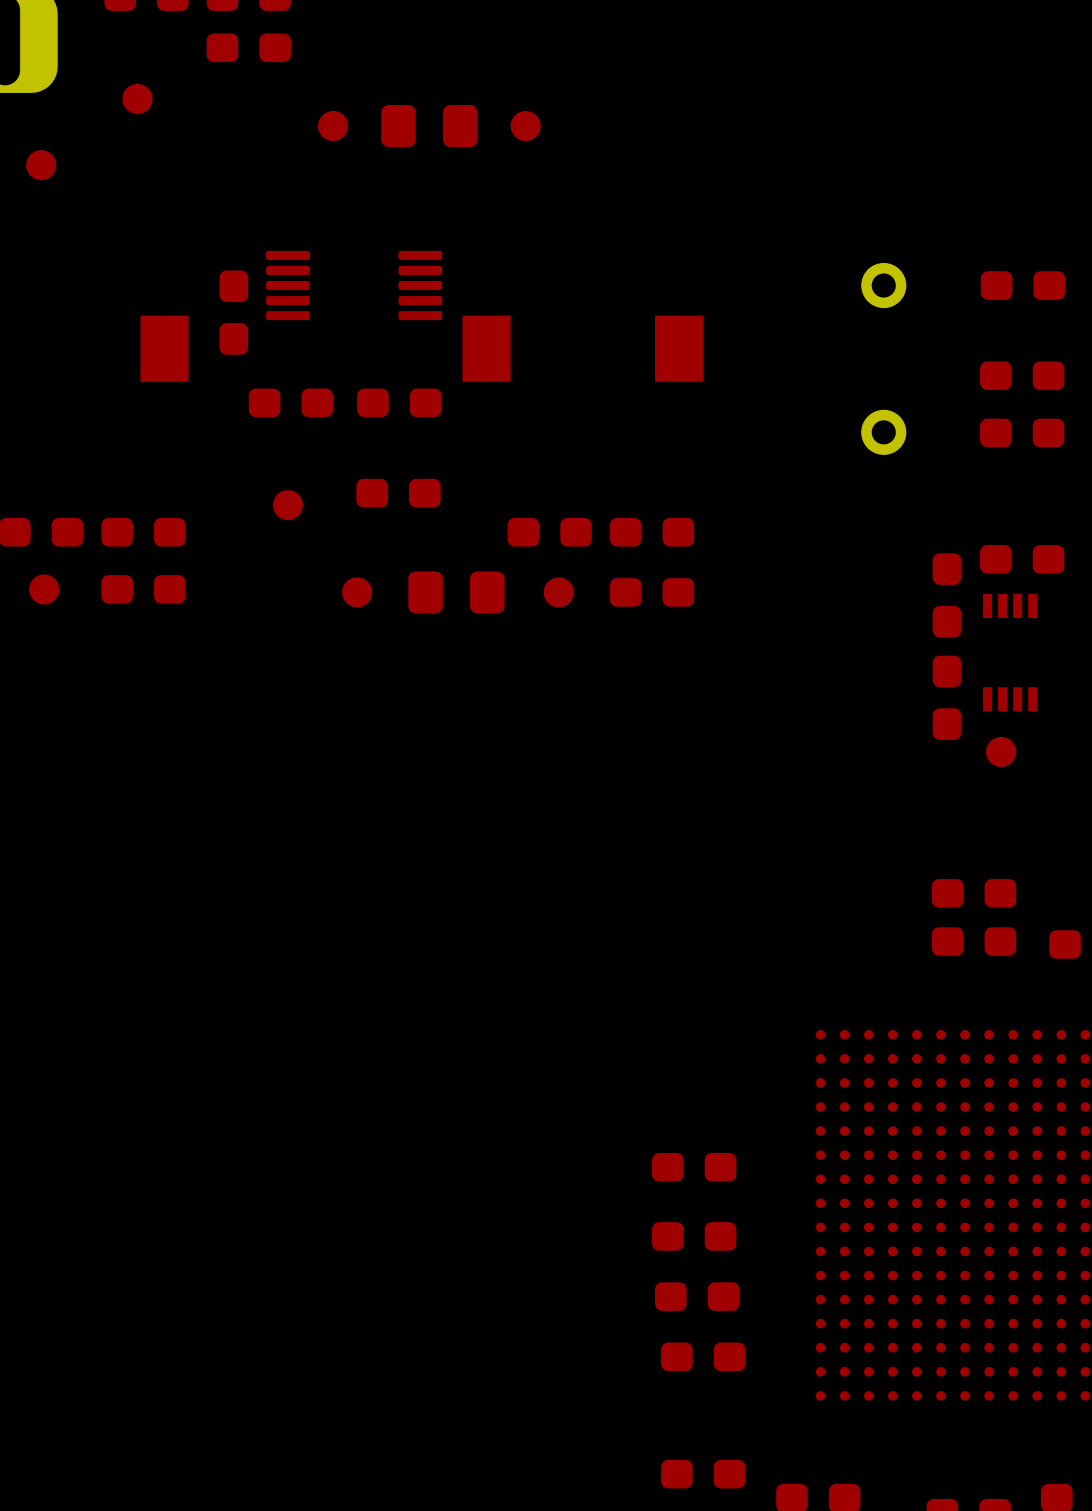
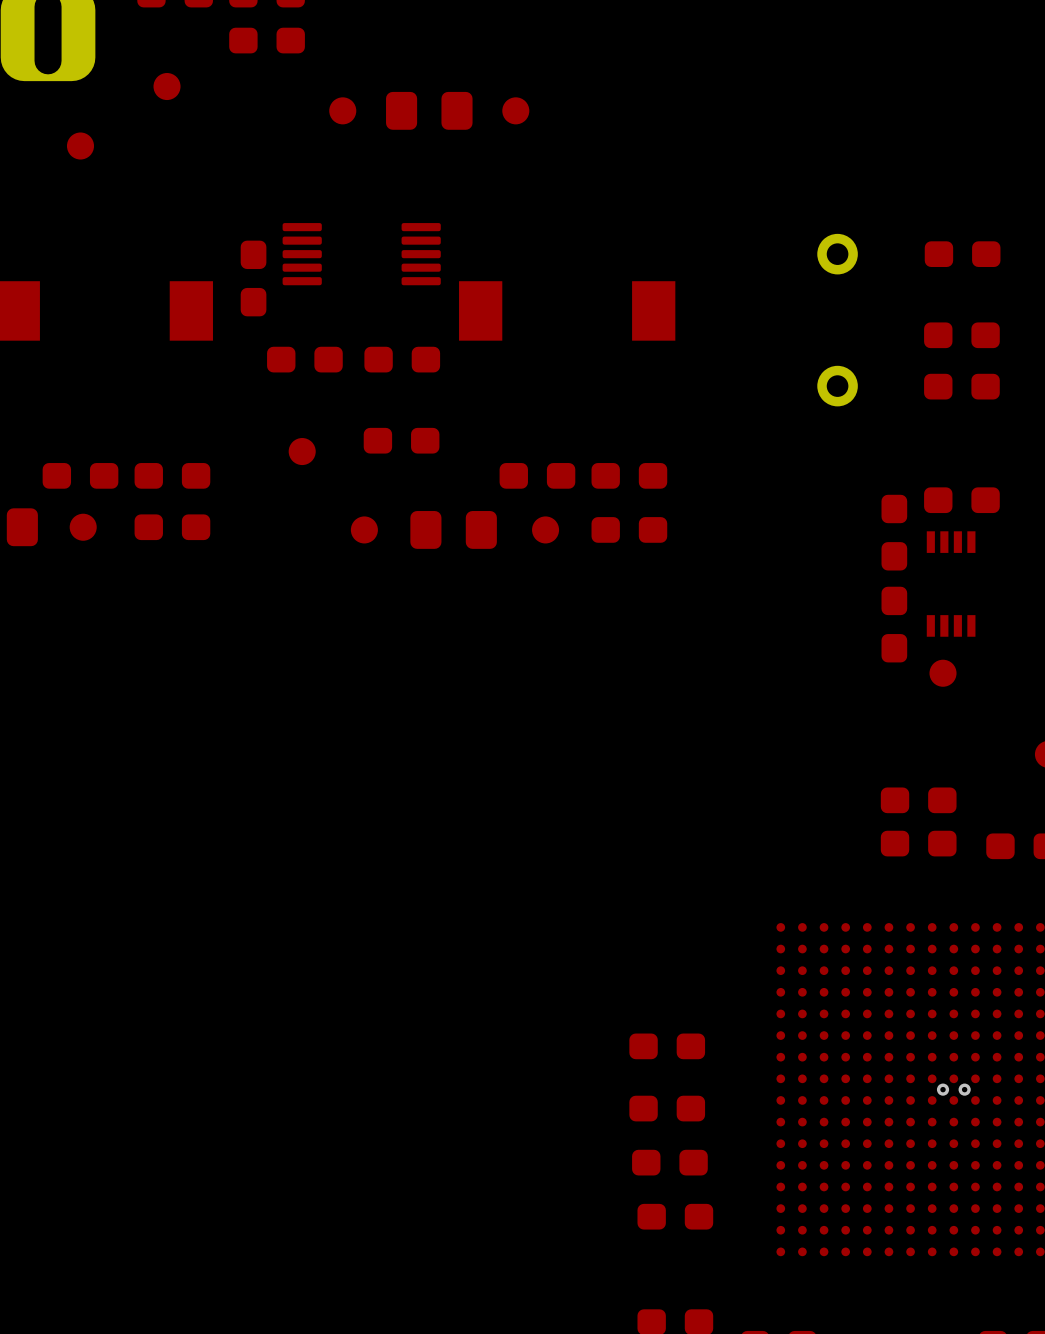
via: none -> (943, 1089)
via: none -> (964, 1089)

